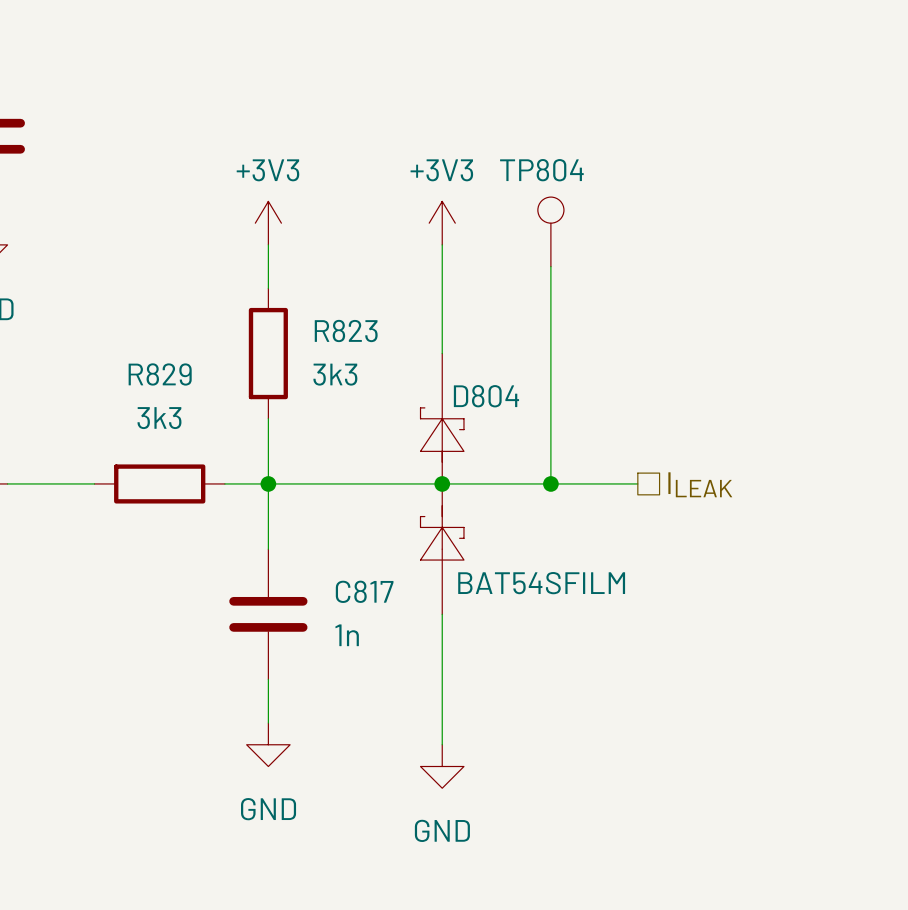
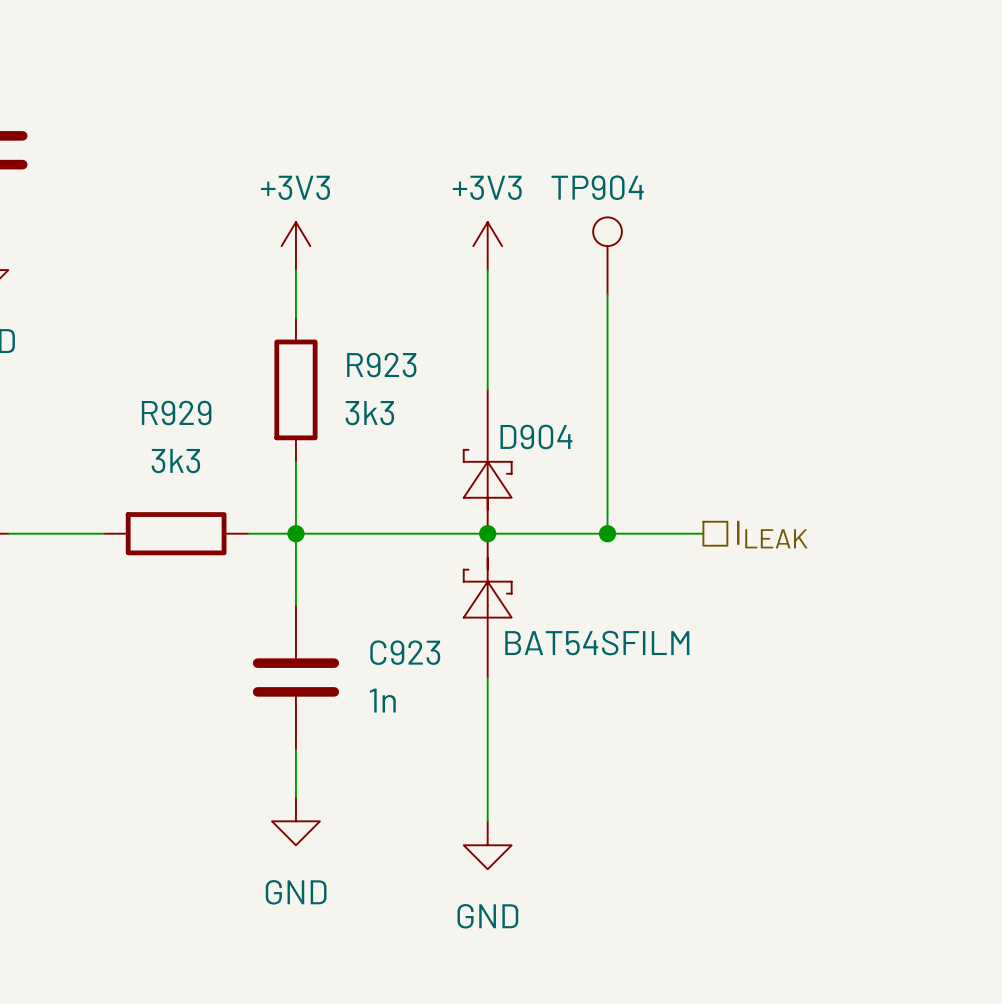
TP804 name: TP804 (541, 170) -> TP904 (597, 187)
R823 name: R823 (346, 330) -> R923 (381, 365)
R829 name: R829 (160, 374) -> R929 (176, 412)
D804 name: D804 (486, 396) -> D904 (536, 436)
C817 name: C817 (364, 591) -> C923 (405, 652)

